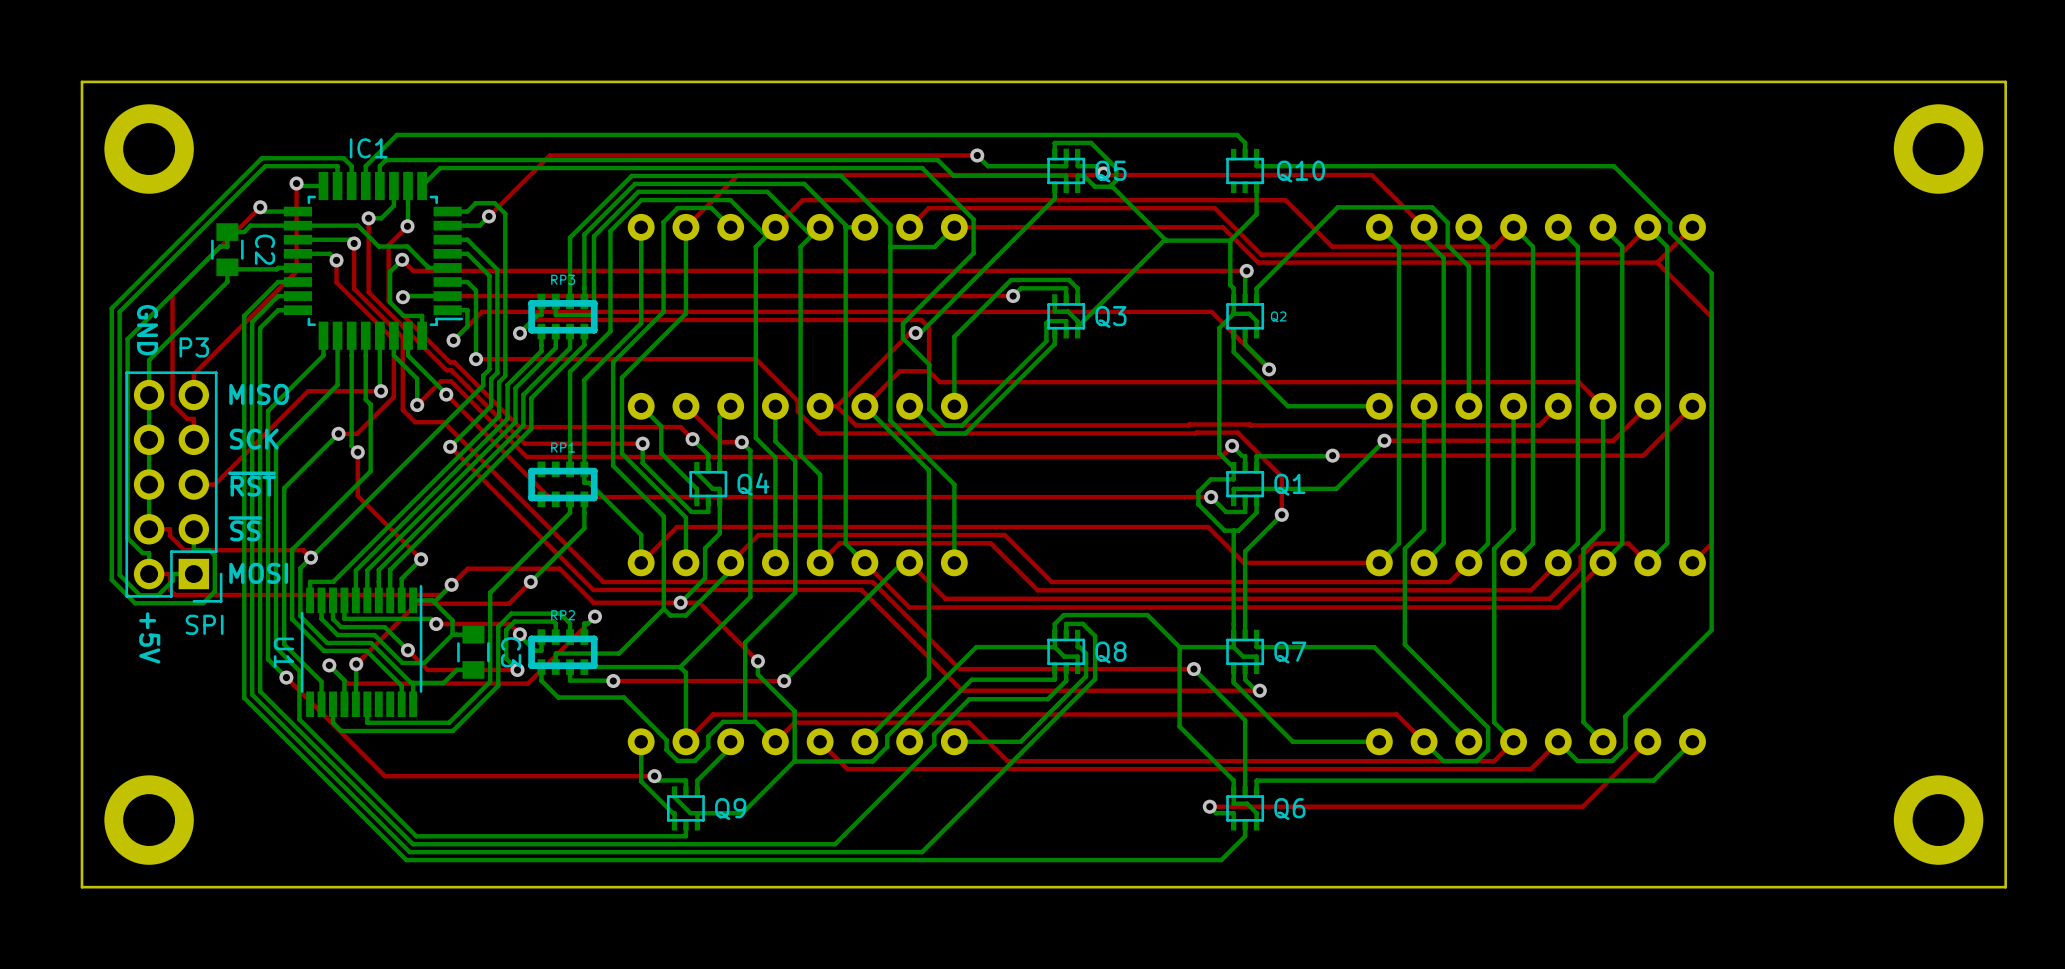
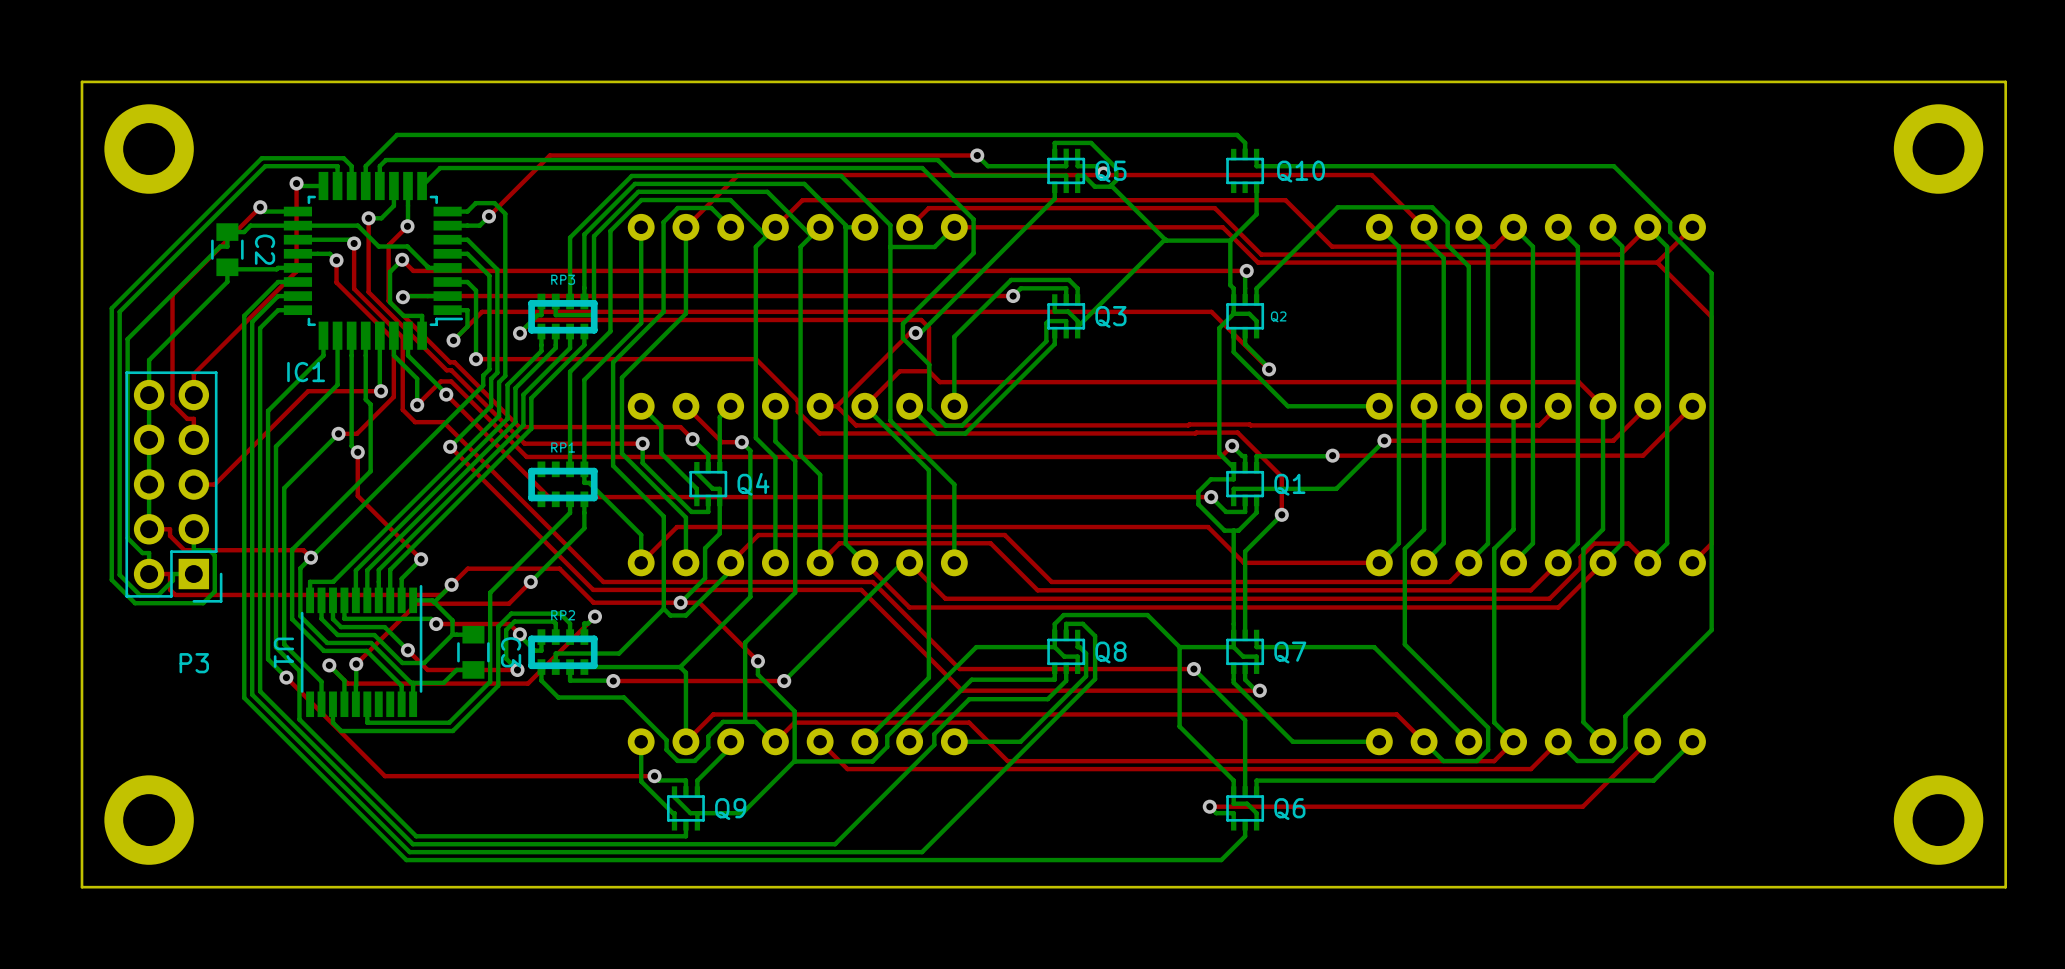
IC1 name position: IC1 (368, 148) -> IC1 (306, 372)
text: GND (147, 330) -> none
P3 name position: P3 (194, 347) -> P3 (194, 663)
text: MISO (259, 394) -> none
text: SCK (254, 439) -> none
text: ~{RST} (252, 484) -> none
text: ~{SS} (245, 528) -> none
text: MOSI (258, 573) -> none
P3 value: SPI (204, 624) -> none
text: +5V (149, 637) -> none

